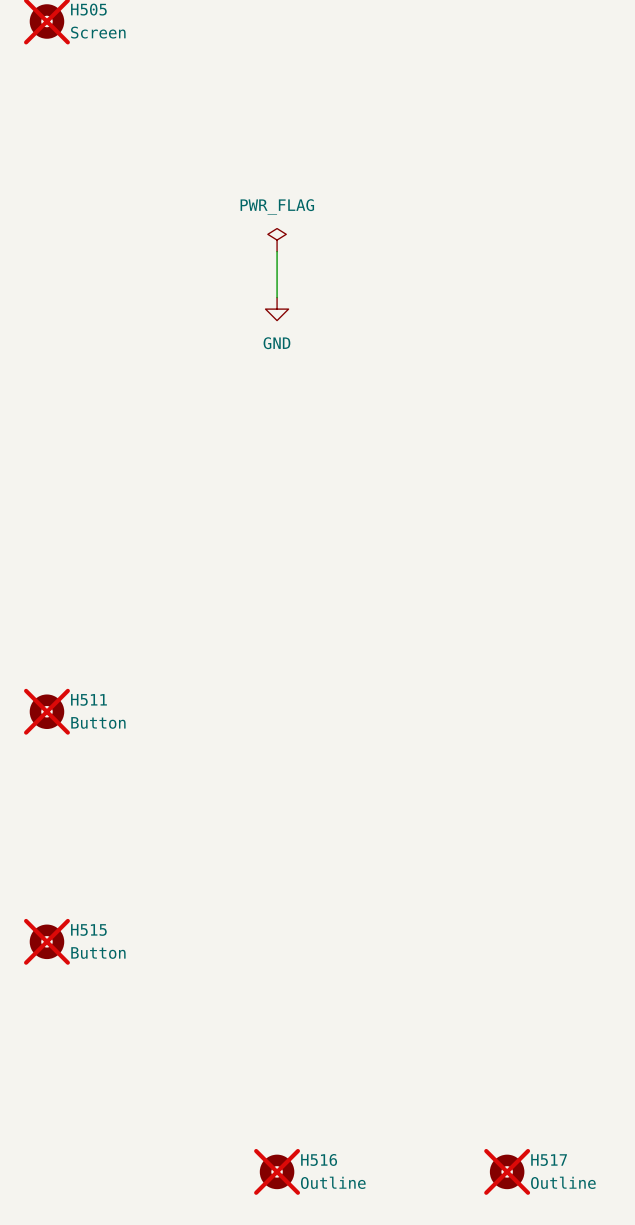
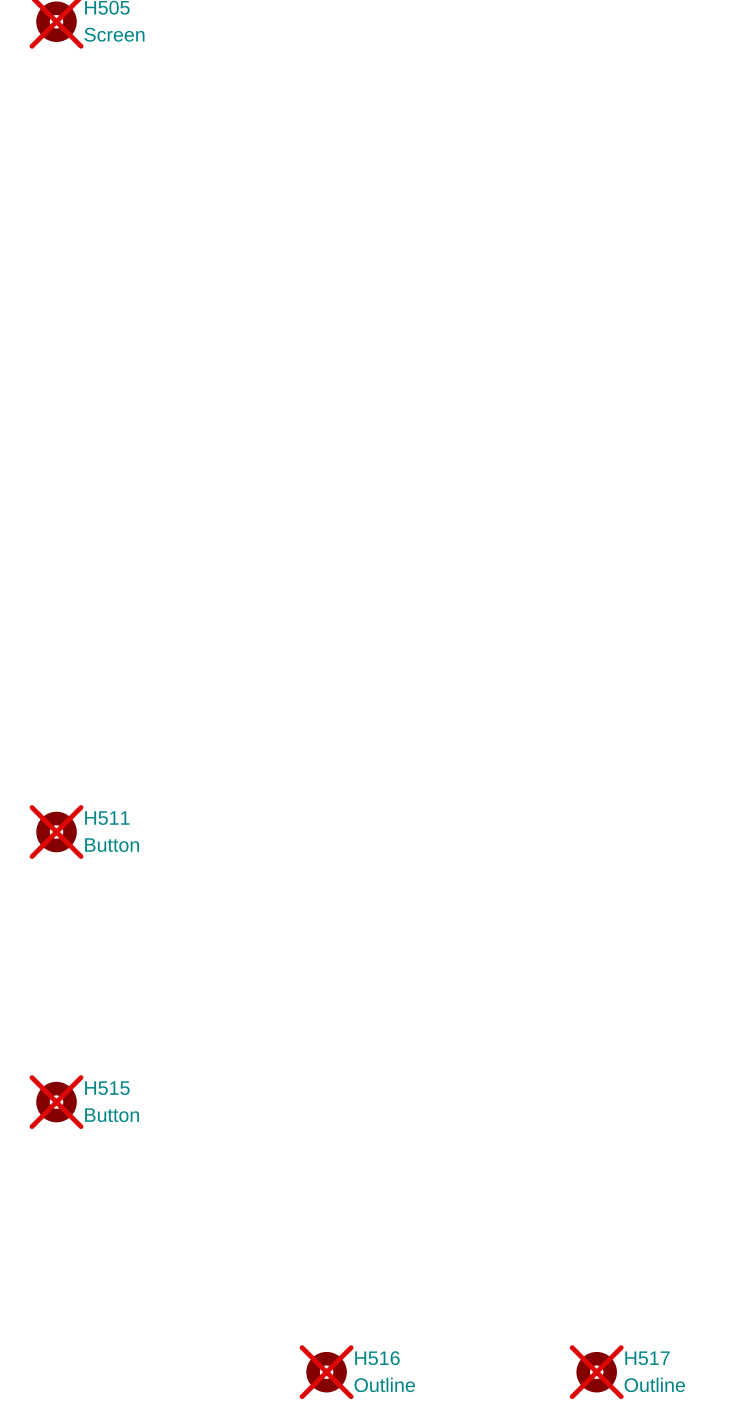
power symbol: PWR_FLAG (277, 240) -> none
wire: (277, 251) (277, 297) -> none
power symbol: GND (277, 309) -> none

